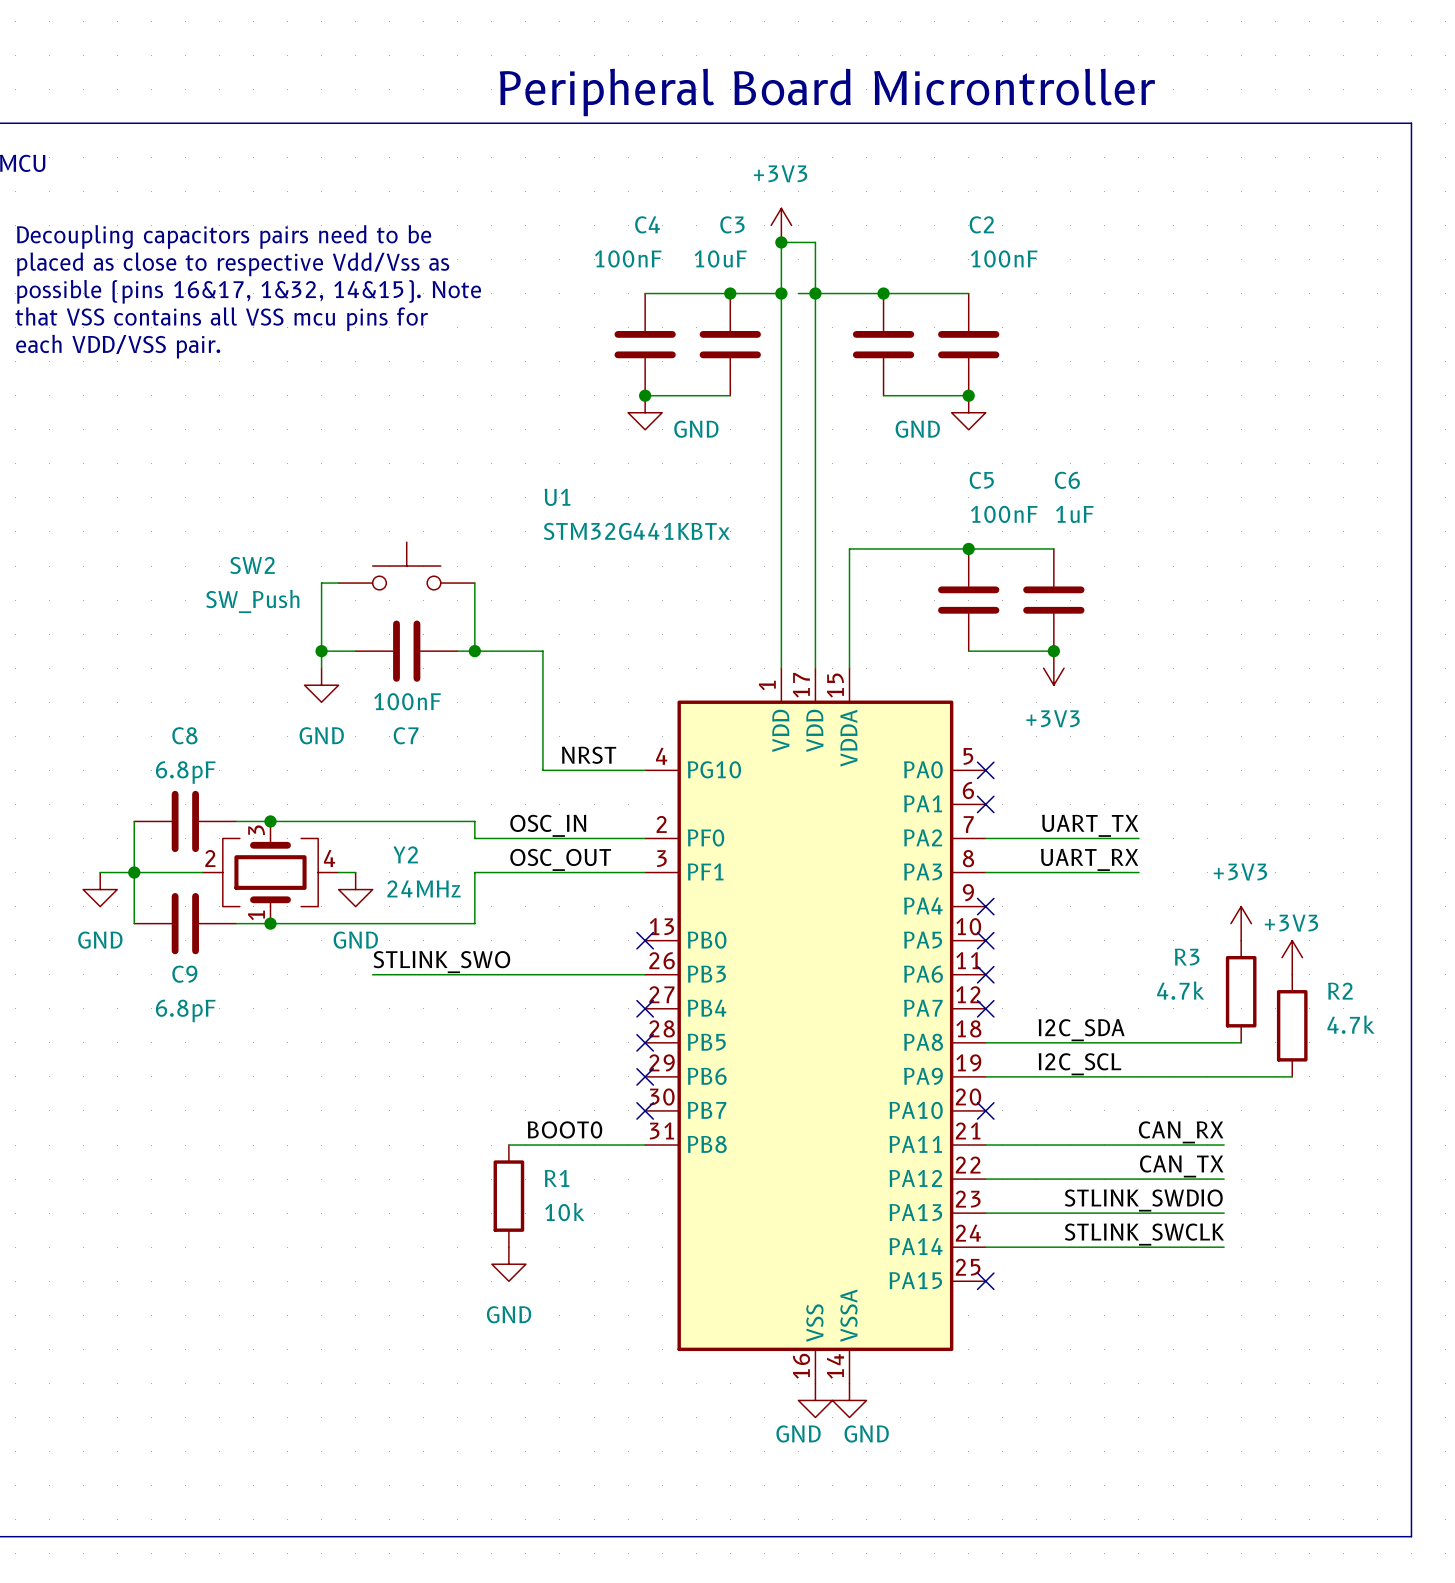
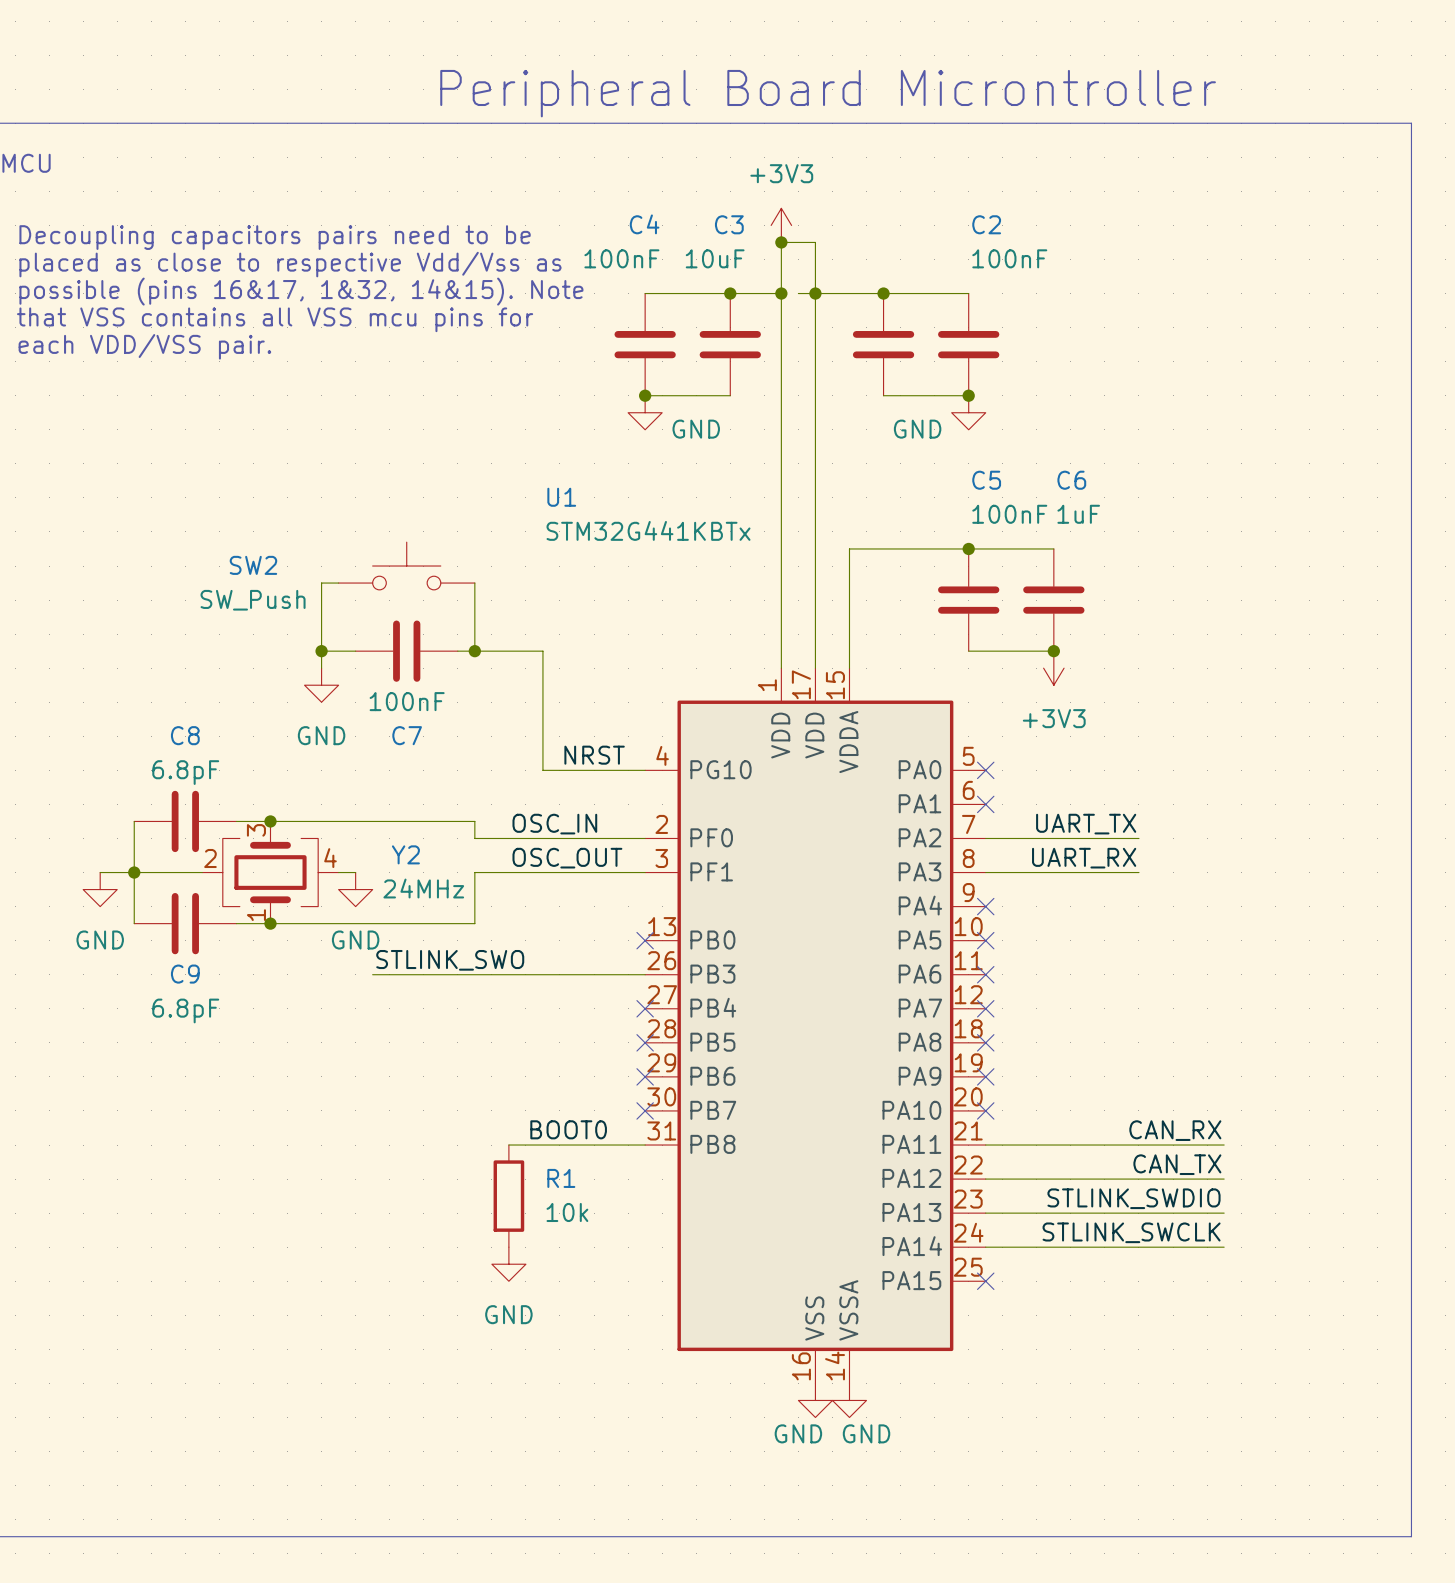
power symbol: +3V3 (1241, 923) -> none
power symbol: +3V3 (1292, 957) -> none
R3: 4.7k (1241, 991) -> none
R2: 4.7k (1292, 1025) -> none
label: I2C_SDA (1081, 1030) -> none
wire: (985, 1042) (1241, 1042) -> none
no-connect mark: none -> (985, 1042)
label: I2C_SCL (1079, 1064) -> none
wire: (985, 1076) (1292, 1076) -> none
no-connect mark: none -> (985, 1076)

